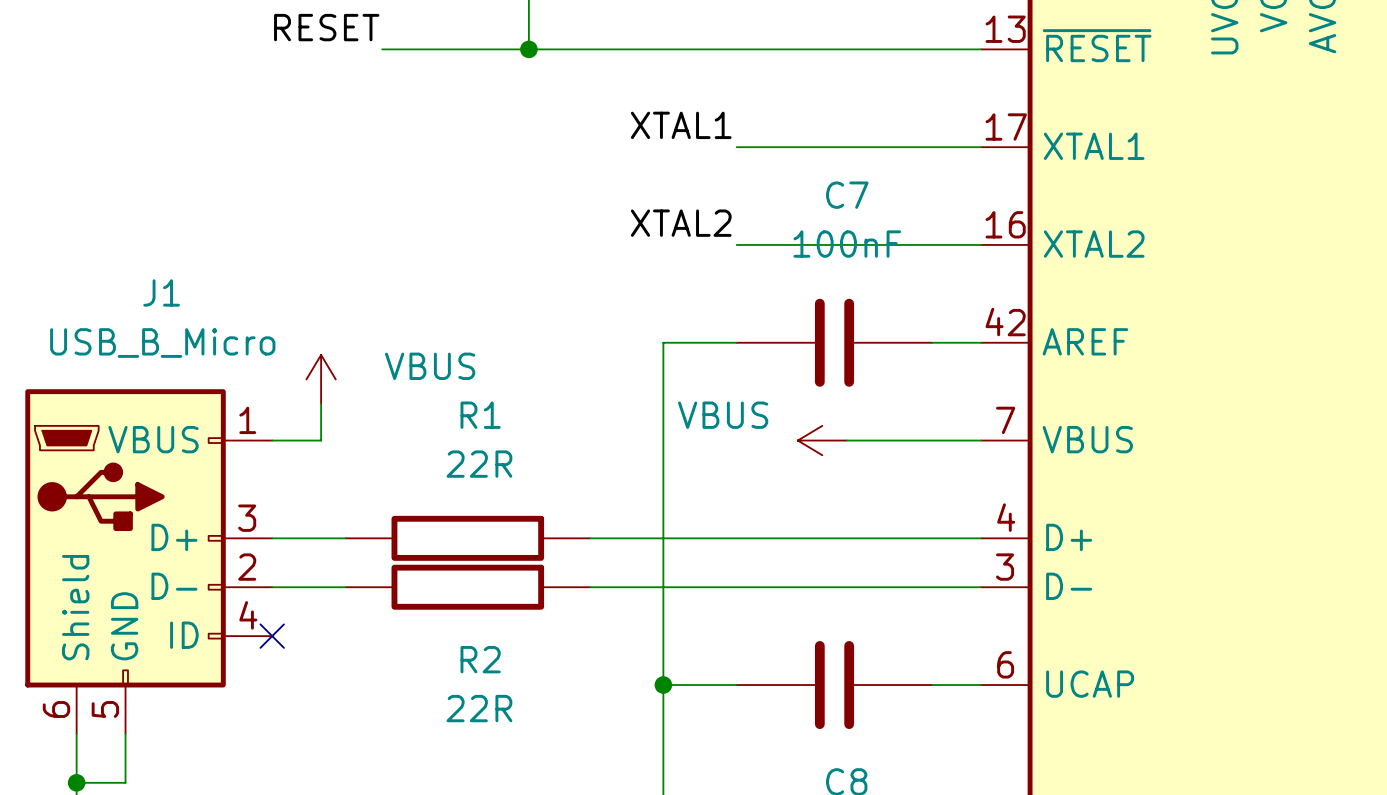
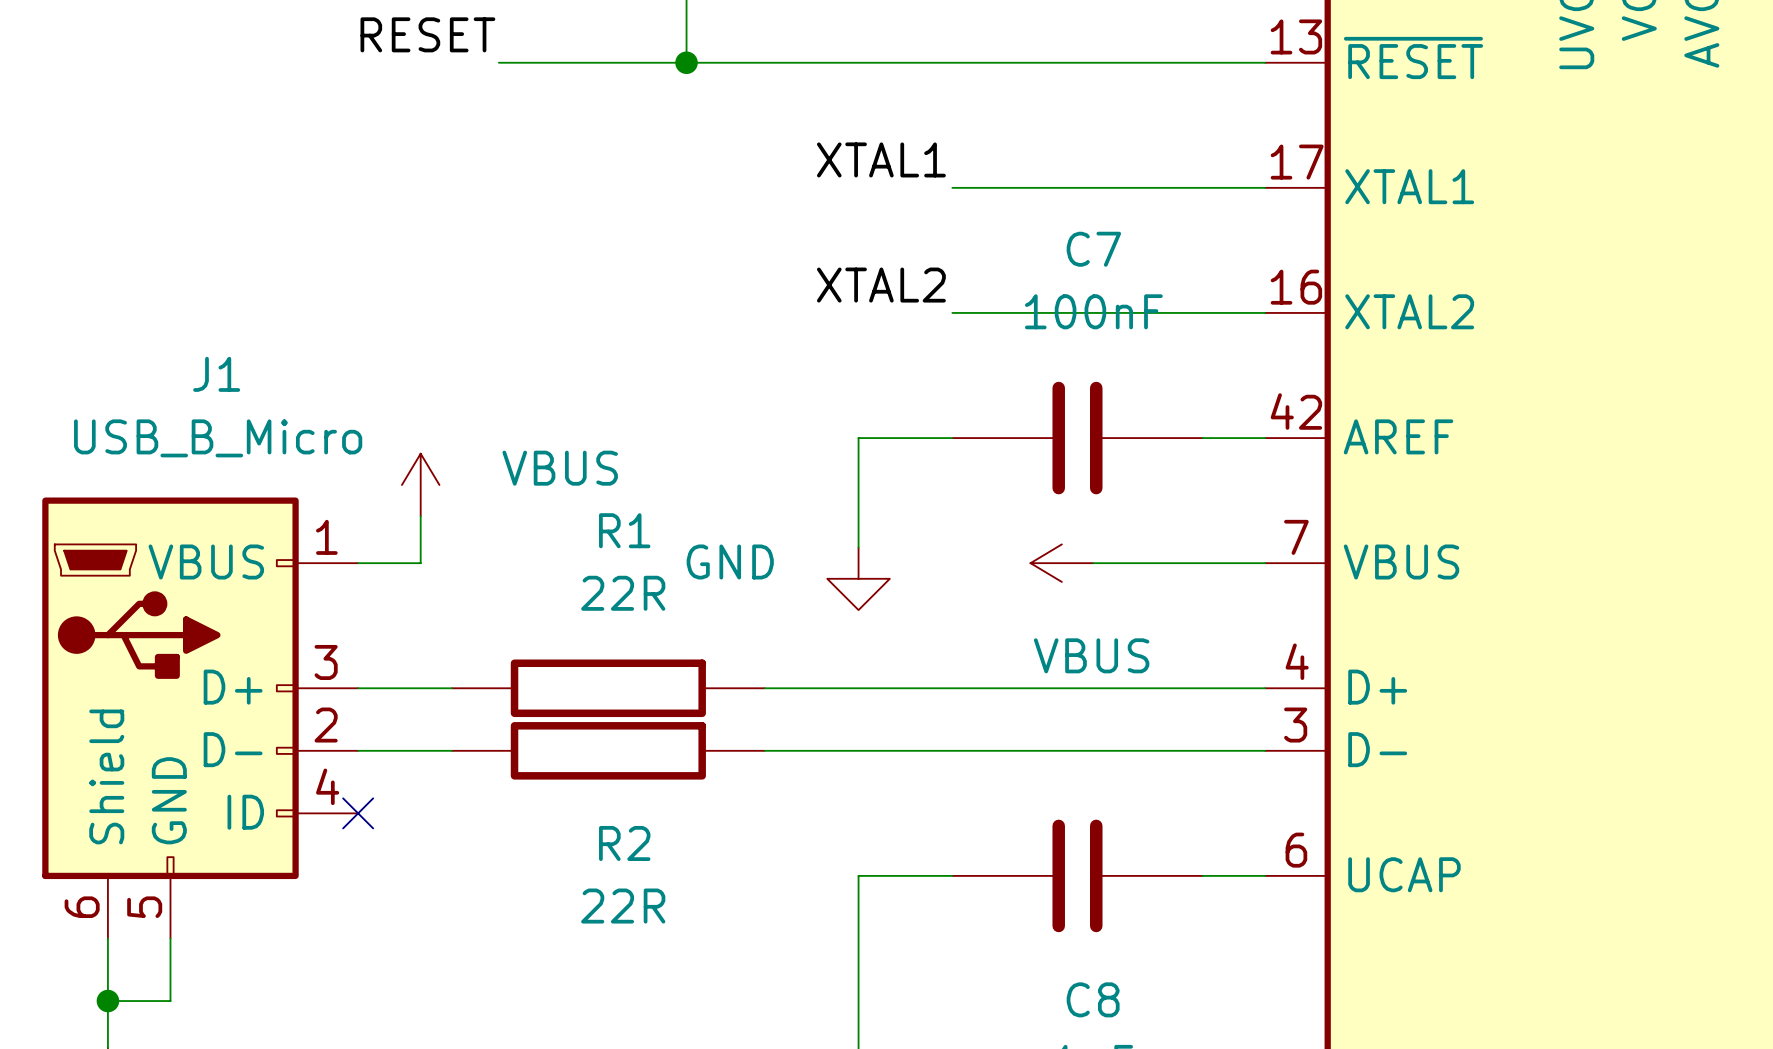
power symbol text position: VBUS (723, 415) -> VBUS (1091, 655)
wire: (663, 428) (663, 685) -> none
power symbol: none -> GND (858, 578)
junction: (663, 685) -> none

